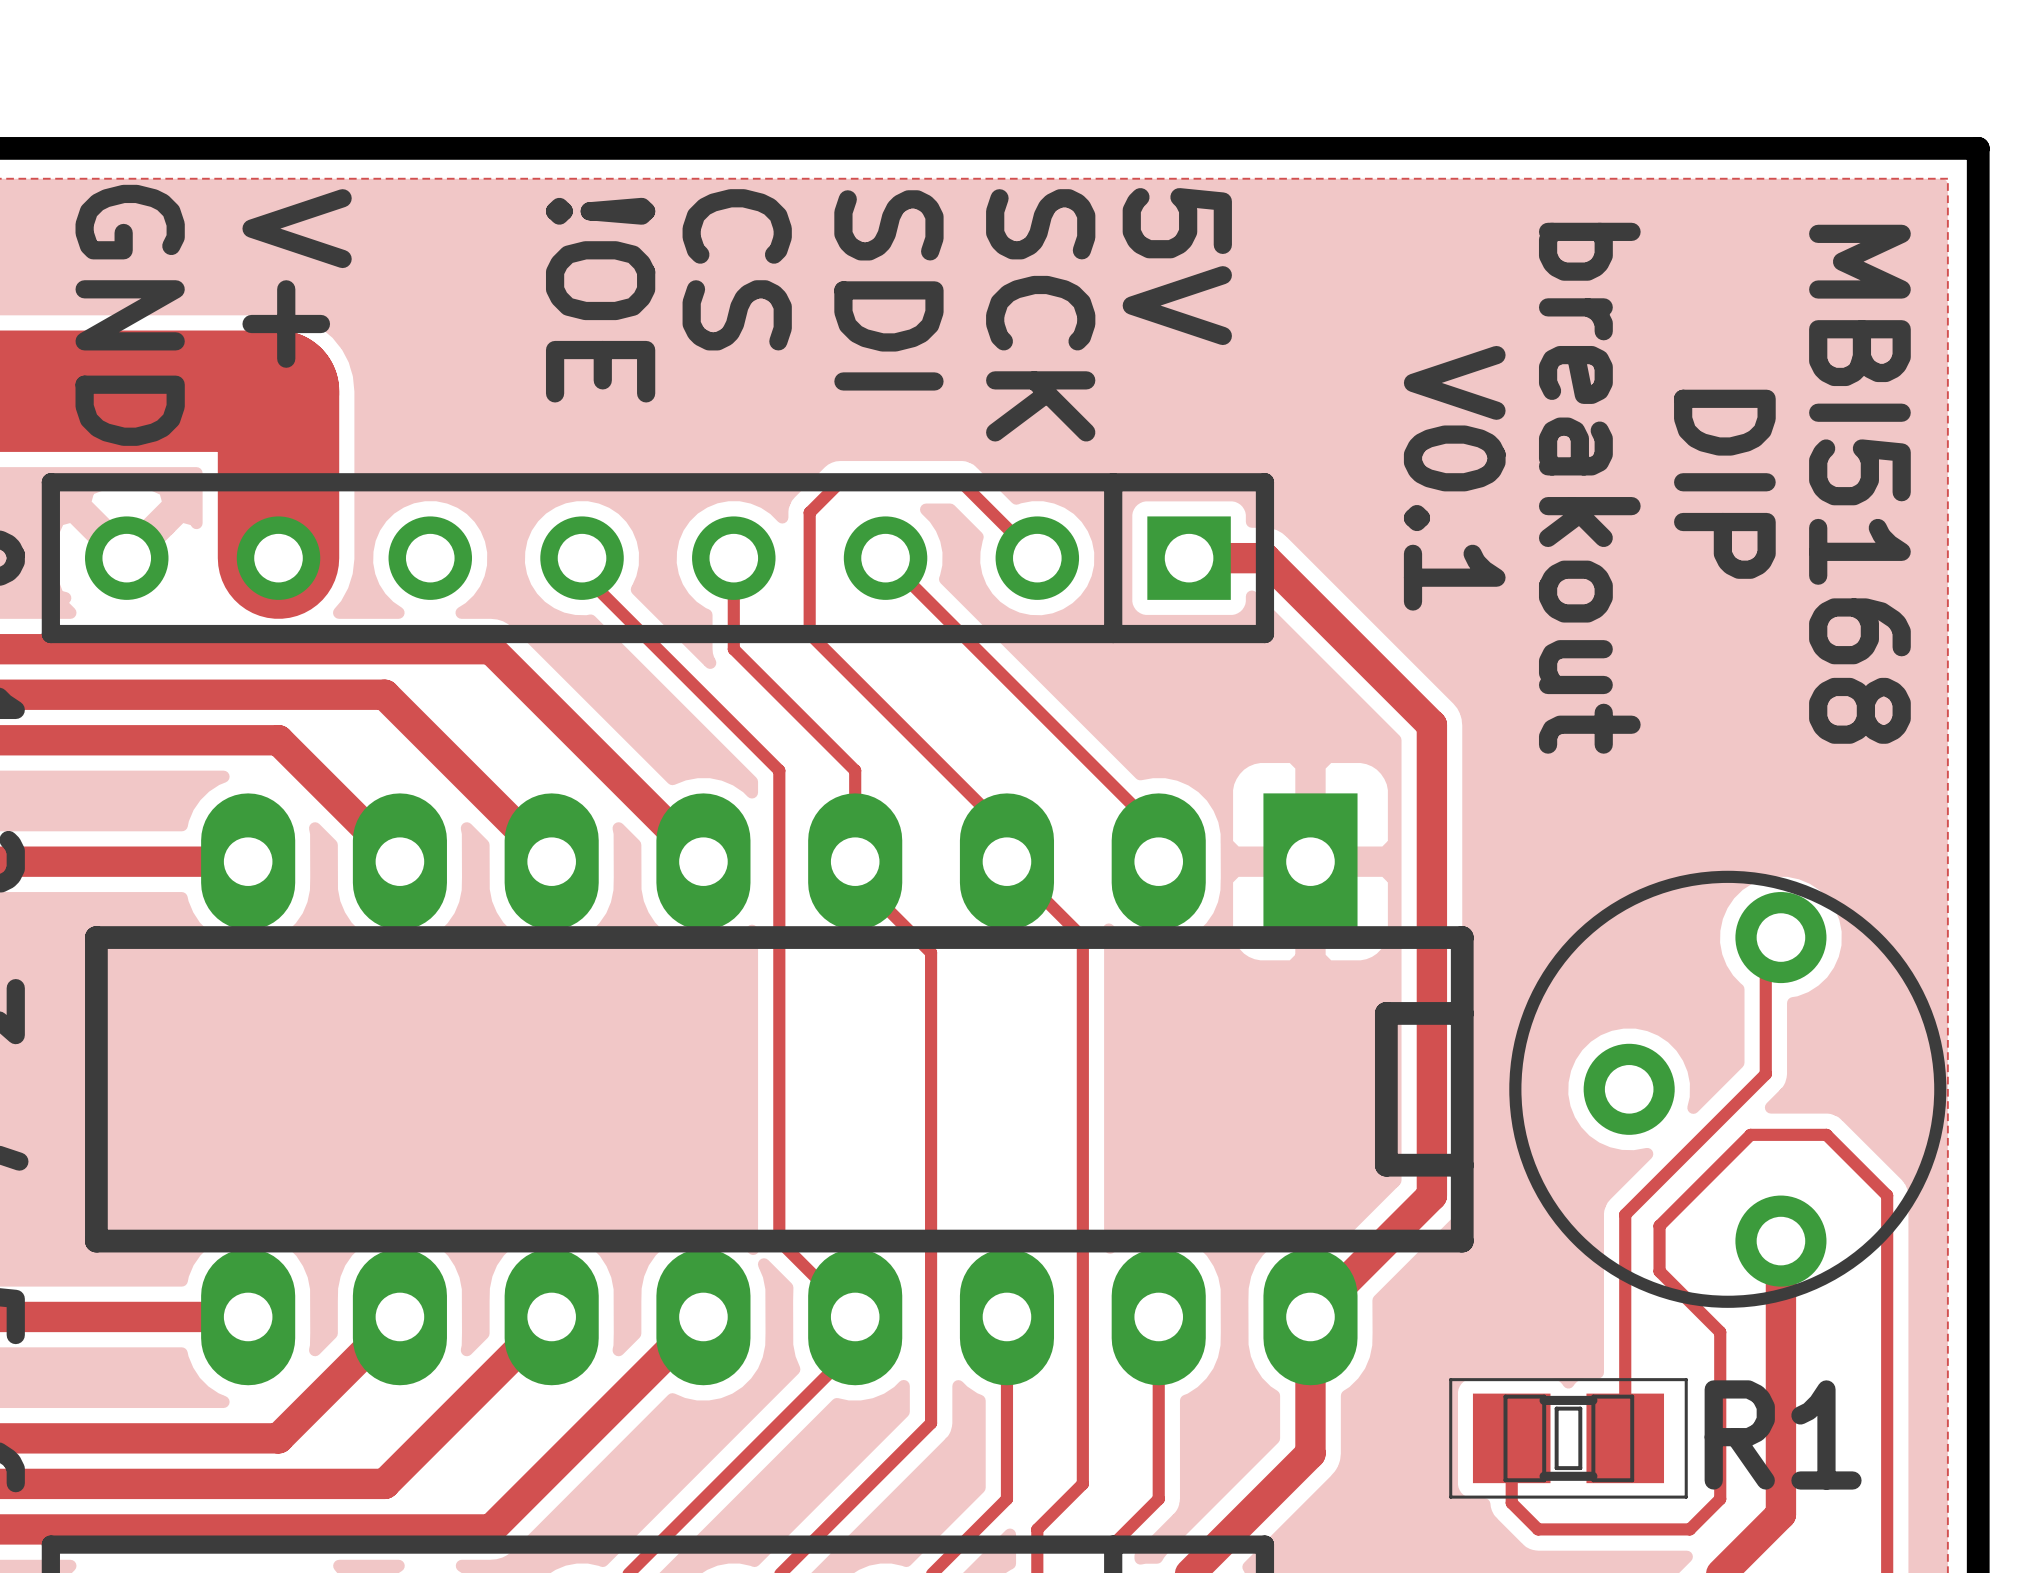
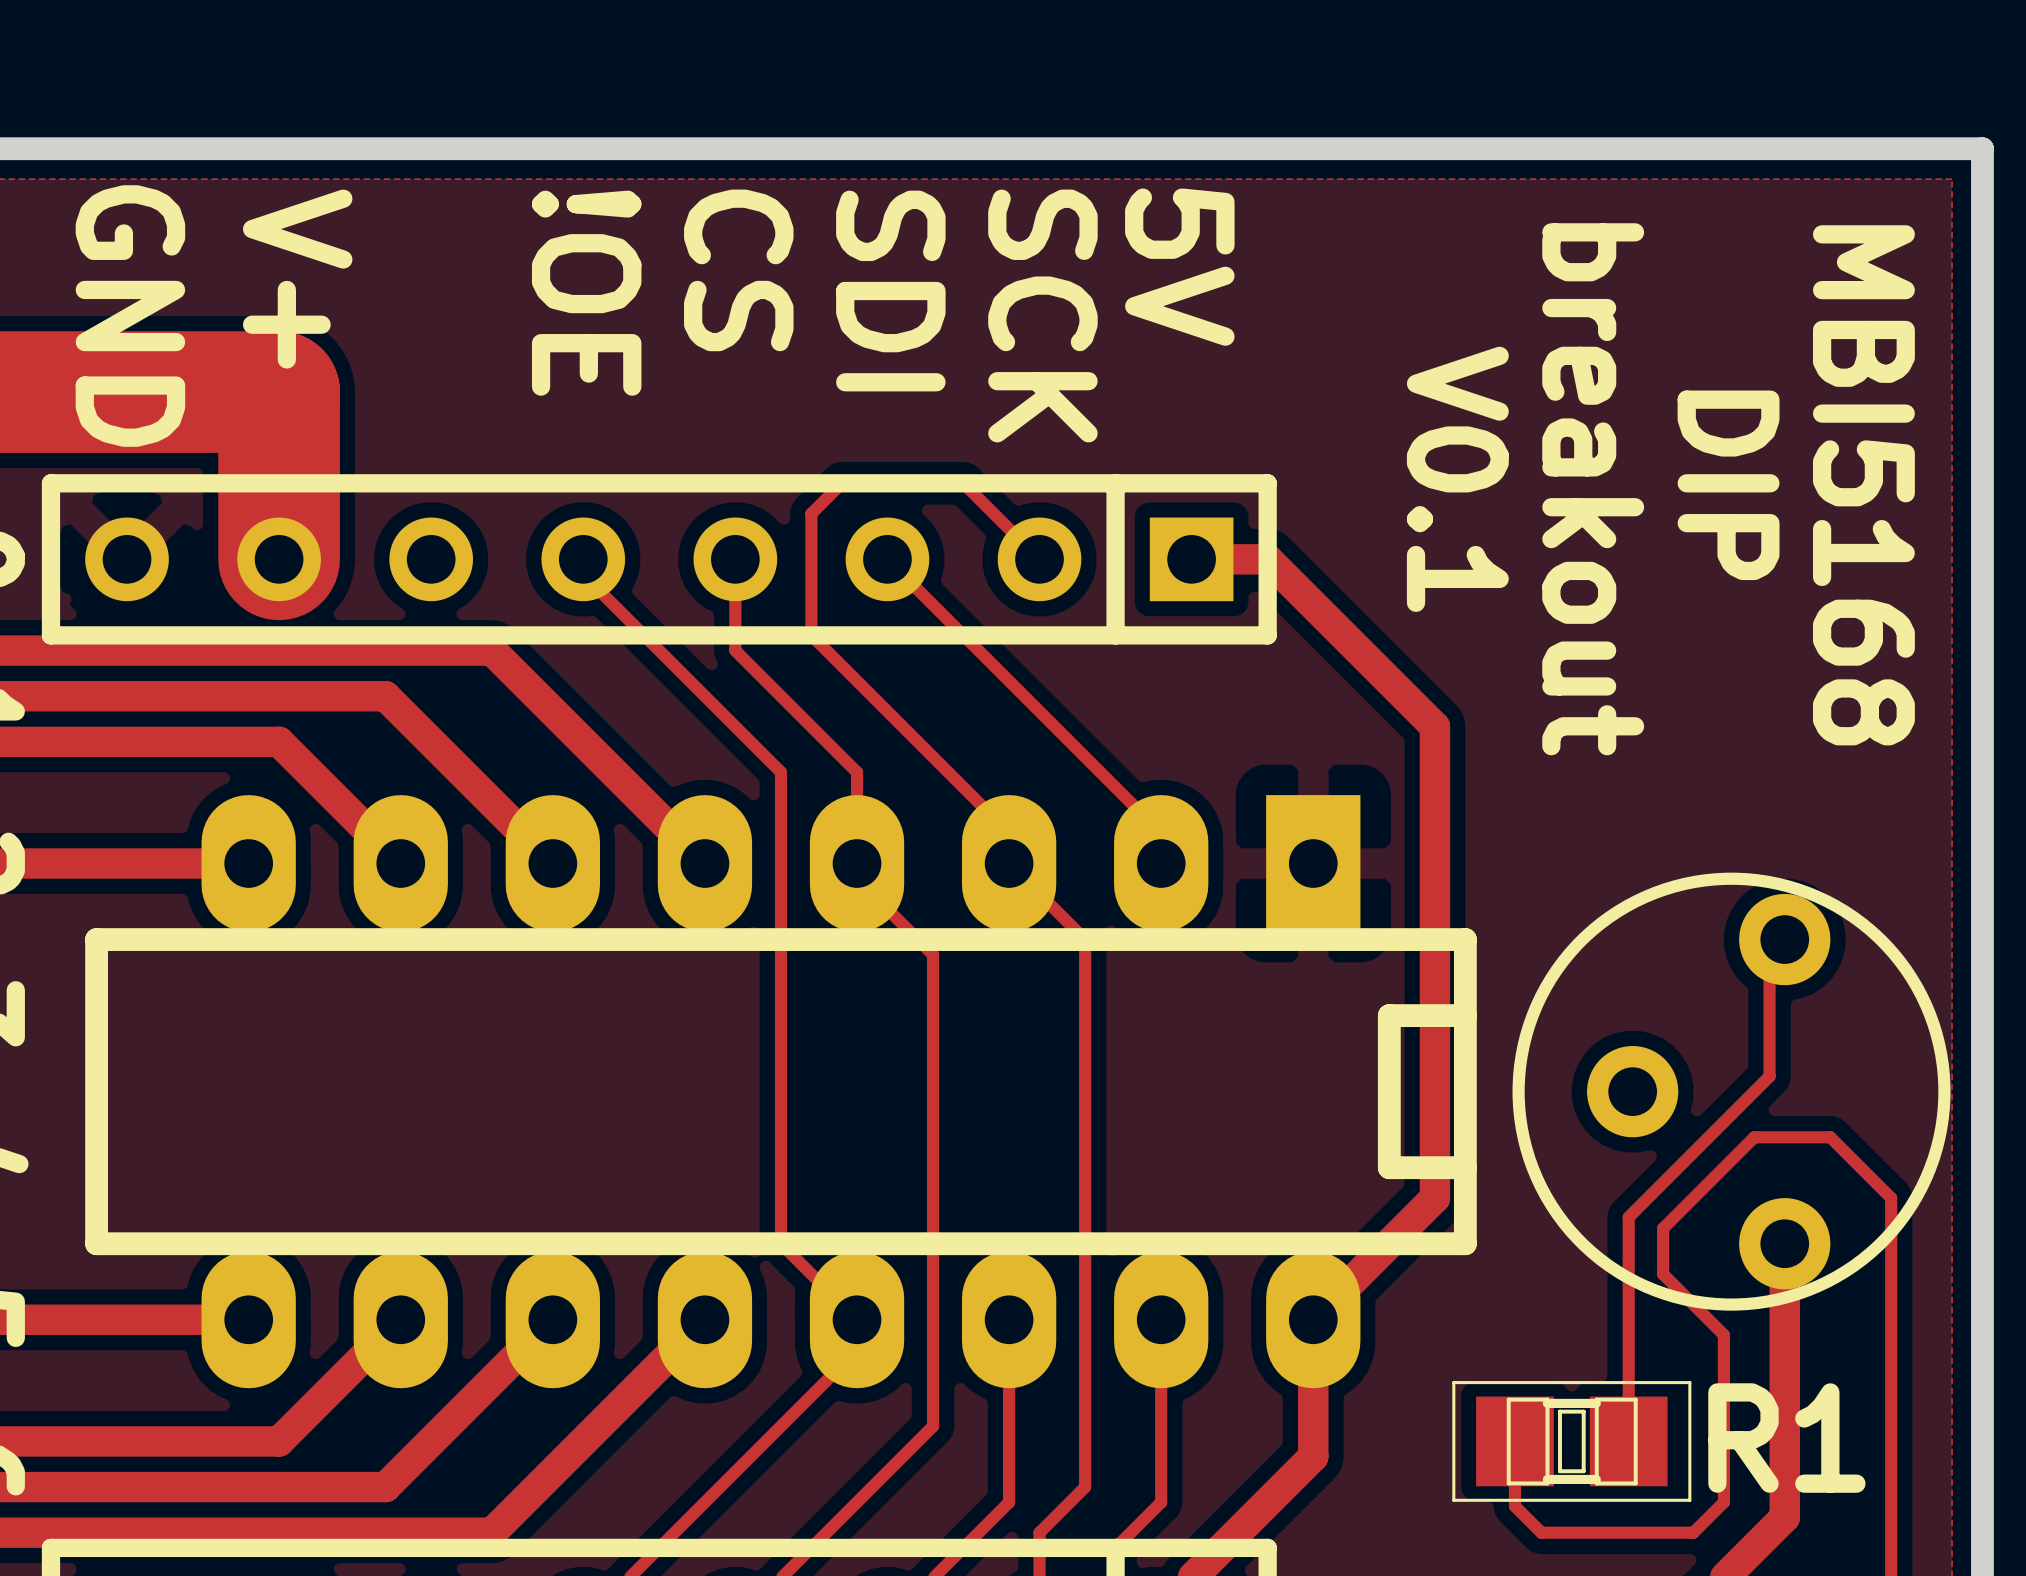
text position: !OE (600, 300) -> !OE (586, 293)

